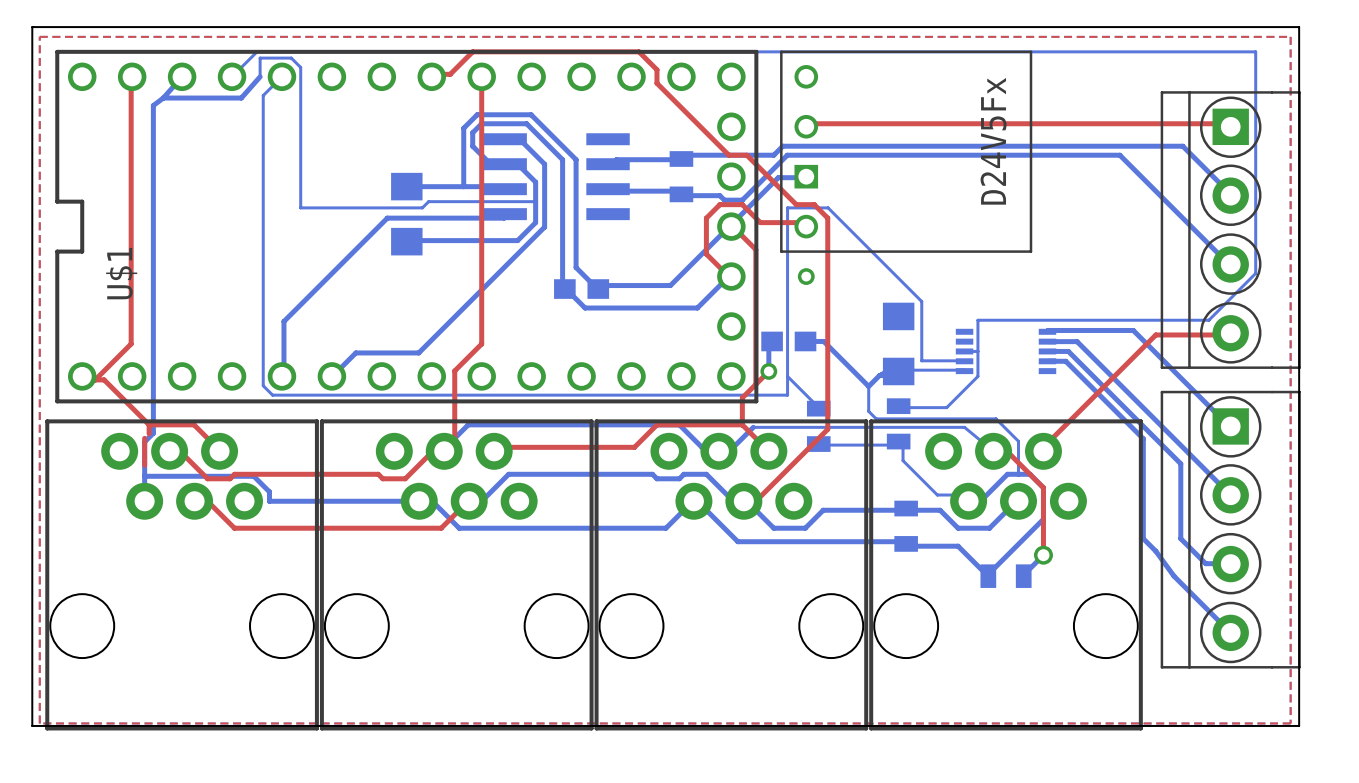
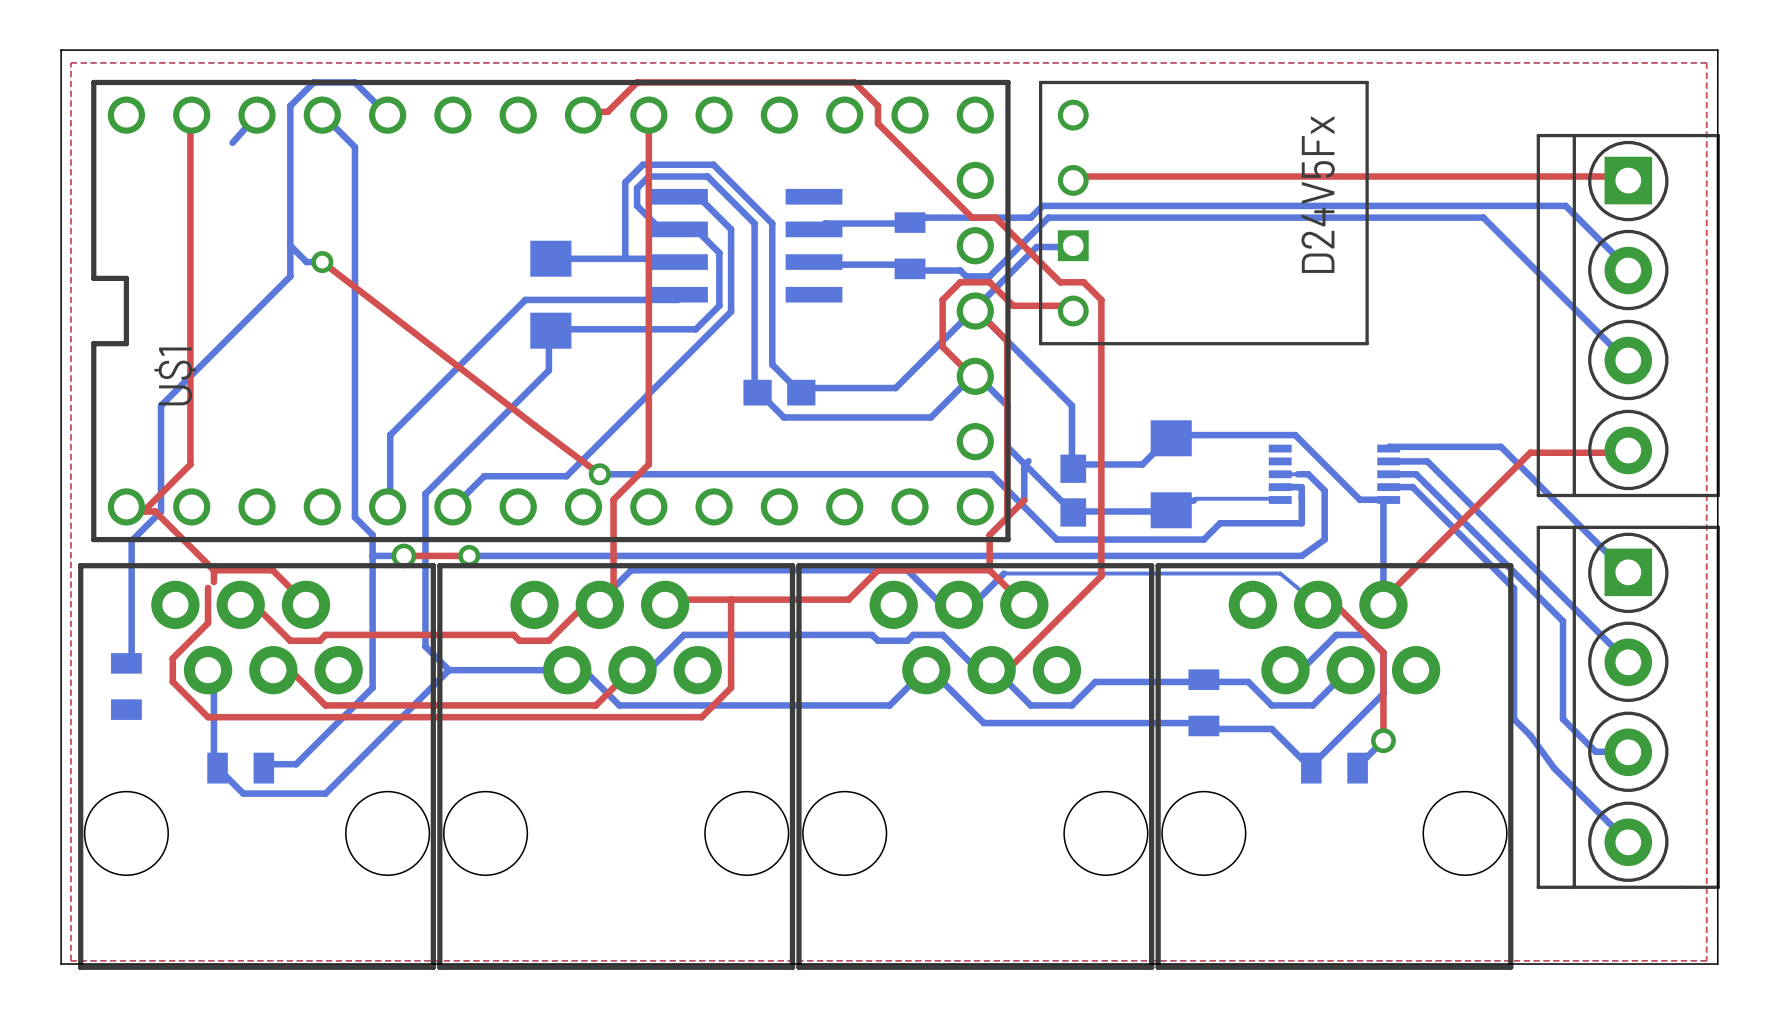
bottom track: (232, 76) (257, 51) (1255, 51) (1255, 273) (1208, 320) (977, 320) (977, 376) (946, 407) (898, 406) -> (322, 115) (354, 147) (354, 517) (372, 535) (372, 687) (296, 764) (266, 764) (263, 768)
bottom track: (281, 76) (263, 95) (263, 385) (272, 395) (787, 395) (787, 207) (828, 207) (921, 301) (921, 360) (964, 361) -> (599, 474) (991, 474) (1056, 539) (1203, 539) (1220, 523) (1301, 523) (1301, 487) (1280, 487)
bottom track: none -> (387, 115) (354, 82) (313, 82) (290, 105) (290, 276) (161, 405) (161, 511) (131, 540) (131, 658) (126, 663)
bottom track: none -> (290, 245) (306, 262) (322, 262)
top track: none -> (322, 262) (599, 474)
via: none -> (322, 262)
bottom track: (535, 201) (428, 201) (422, 207) (300, 207) (300, 67) (291, 58) (260, 58) (260, 76) (241, 98) (163, 98) (153, 105) (153, 433) (144, 441) (144, 501) -> (550, 330) (548, 335) (548, 370) (425, 493) (425, 646) (448, 670) (325, 793) (243, 793) (217, 768) (213, 764) (213, 676) (208, 670)
bottom track: none -> (975, 311) (1071, 405) (1073, 468) (1077, 464) (1142, 464) (1165, 440) (1171, 438) (1171, 435) (1295, 435) (1359, 499) (1383, 499)
via: (806, 276) -> none
part rotation: 0° (788, 341) -> 90° clockwise (1073, 490)
bottom track: (805, 341) (823, 341) (868, 386) -> none
part position: (898, 343) -> (1171, 474)
via: none -> (599, 474)
bottom track: none -> (1297, 474) (1308, 474) (1324, 490) (1324, 539) (1301, 555) (469, 555)
bottom track: none -> (1383, 499) (1383, 604)
via: (768, 371) -> none
bottom track: (881, 375) (868, 386) -> (1171, 505) (1171, 510) (1165, 511) (1073, 512) (1007, 446) (1007, 405) (977, 376) (975, 376)
bottom track: (787, 376) (818, 408) -> none
bottom track: (868, 386) (868, 411) (876, 418) (996, 418) (1018, 441) (1018, 474) -> none
bottom track: none -> (372, 555) (403, 555)
top track: none -> (403, 555) (469, 555)
via: none -> (403, 555)
via: none -> (469, 555)
part: (898, 423) -> none
part: (818, 426) -> none
bottom track: (818, 444) (896, 445) (898, 441) (903, 448) (903, 460) (937, 495) (968, 495) (968, 501) -> none
top track: none -> (731, 599) (731, 687) (701, 717) (208, 717) (172, 681) (172, 658) (208, 623)
bottom track: (144, 476) (253, 476) (269, 491) (269, 501) (328, 501) -> none
part: none -> (126, 686)
part: none -> (240, 768)

